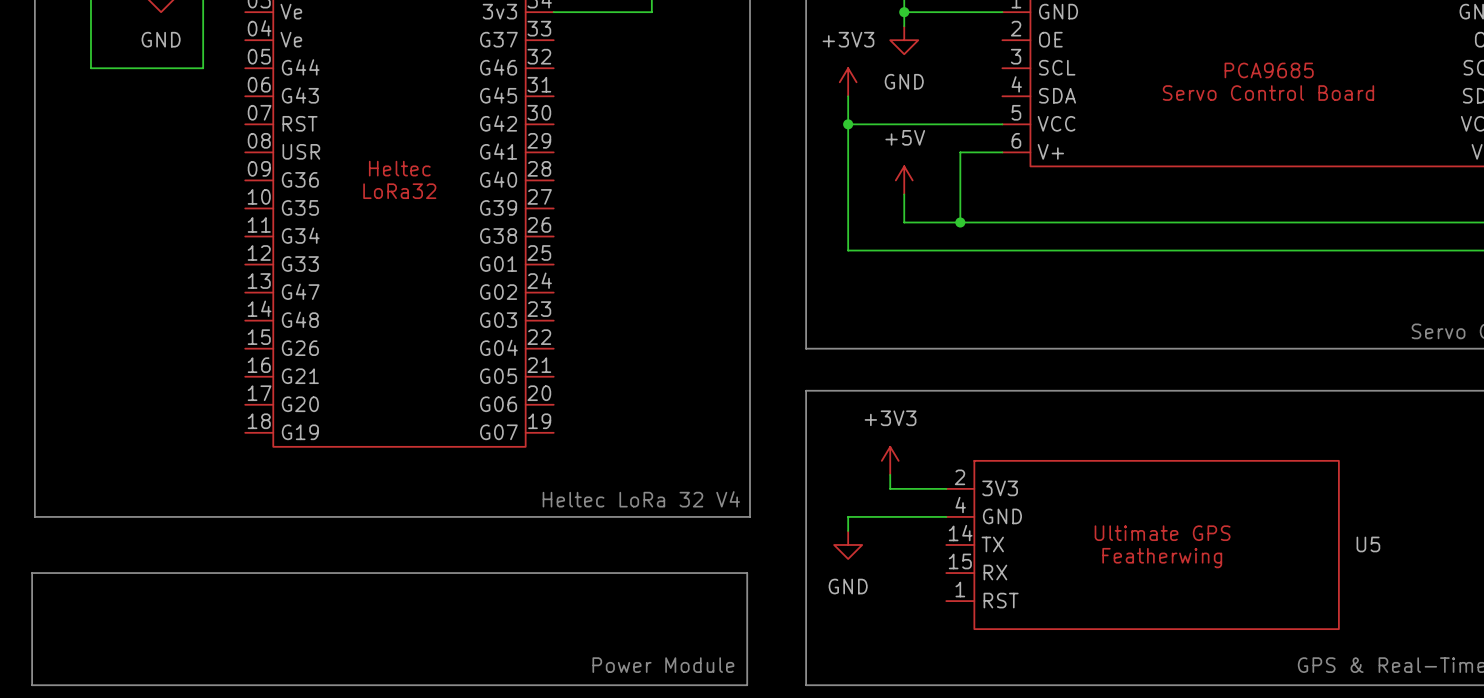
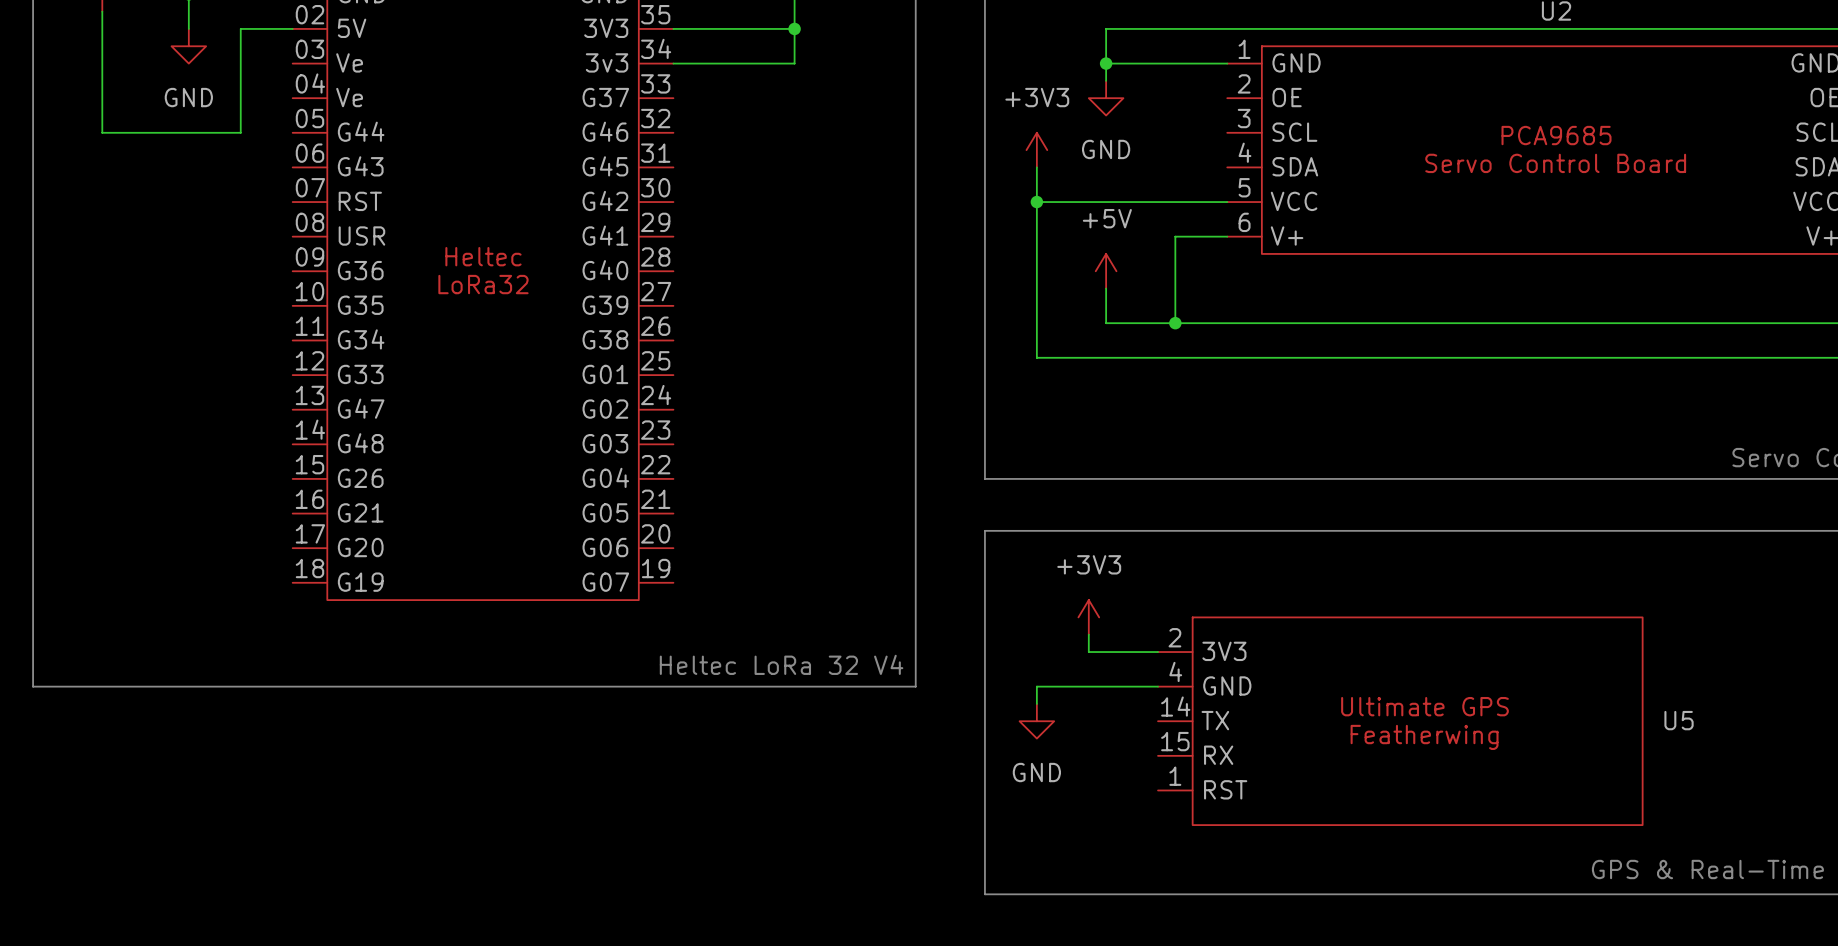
line: (32, 573) (747, 573) (747, 685) (32, 685) (32, 573) -> none
text: Power Module (663, 665) -> none

